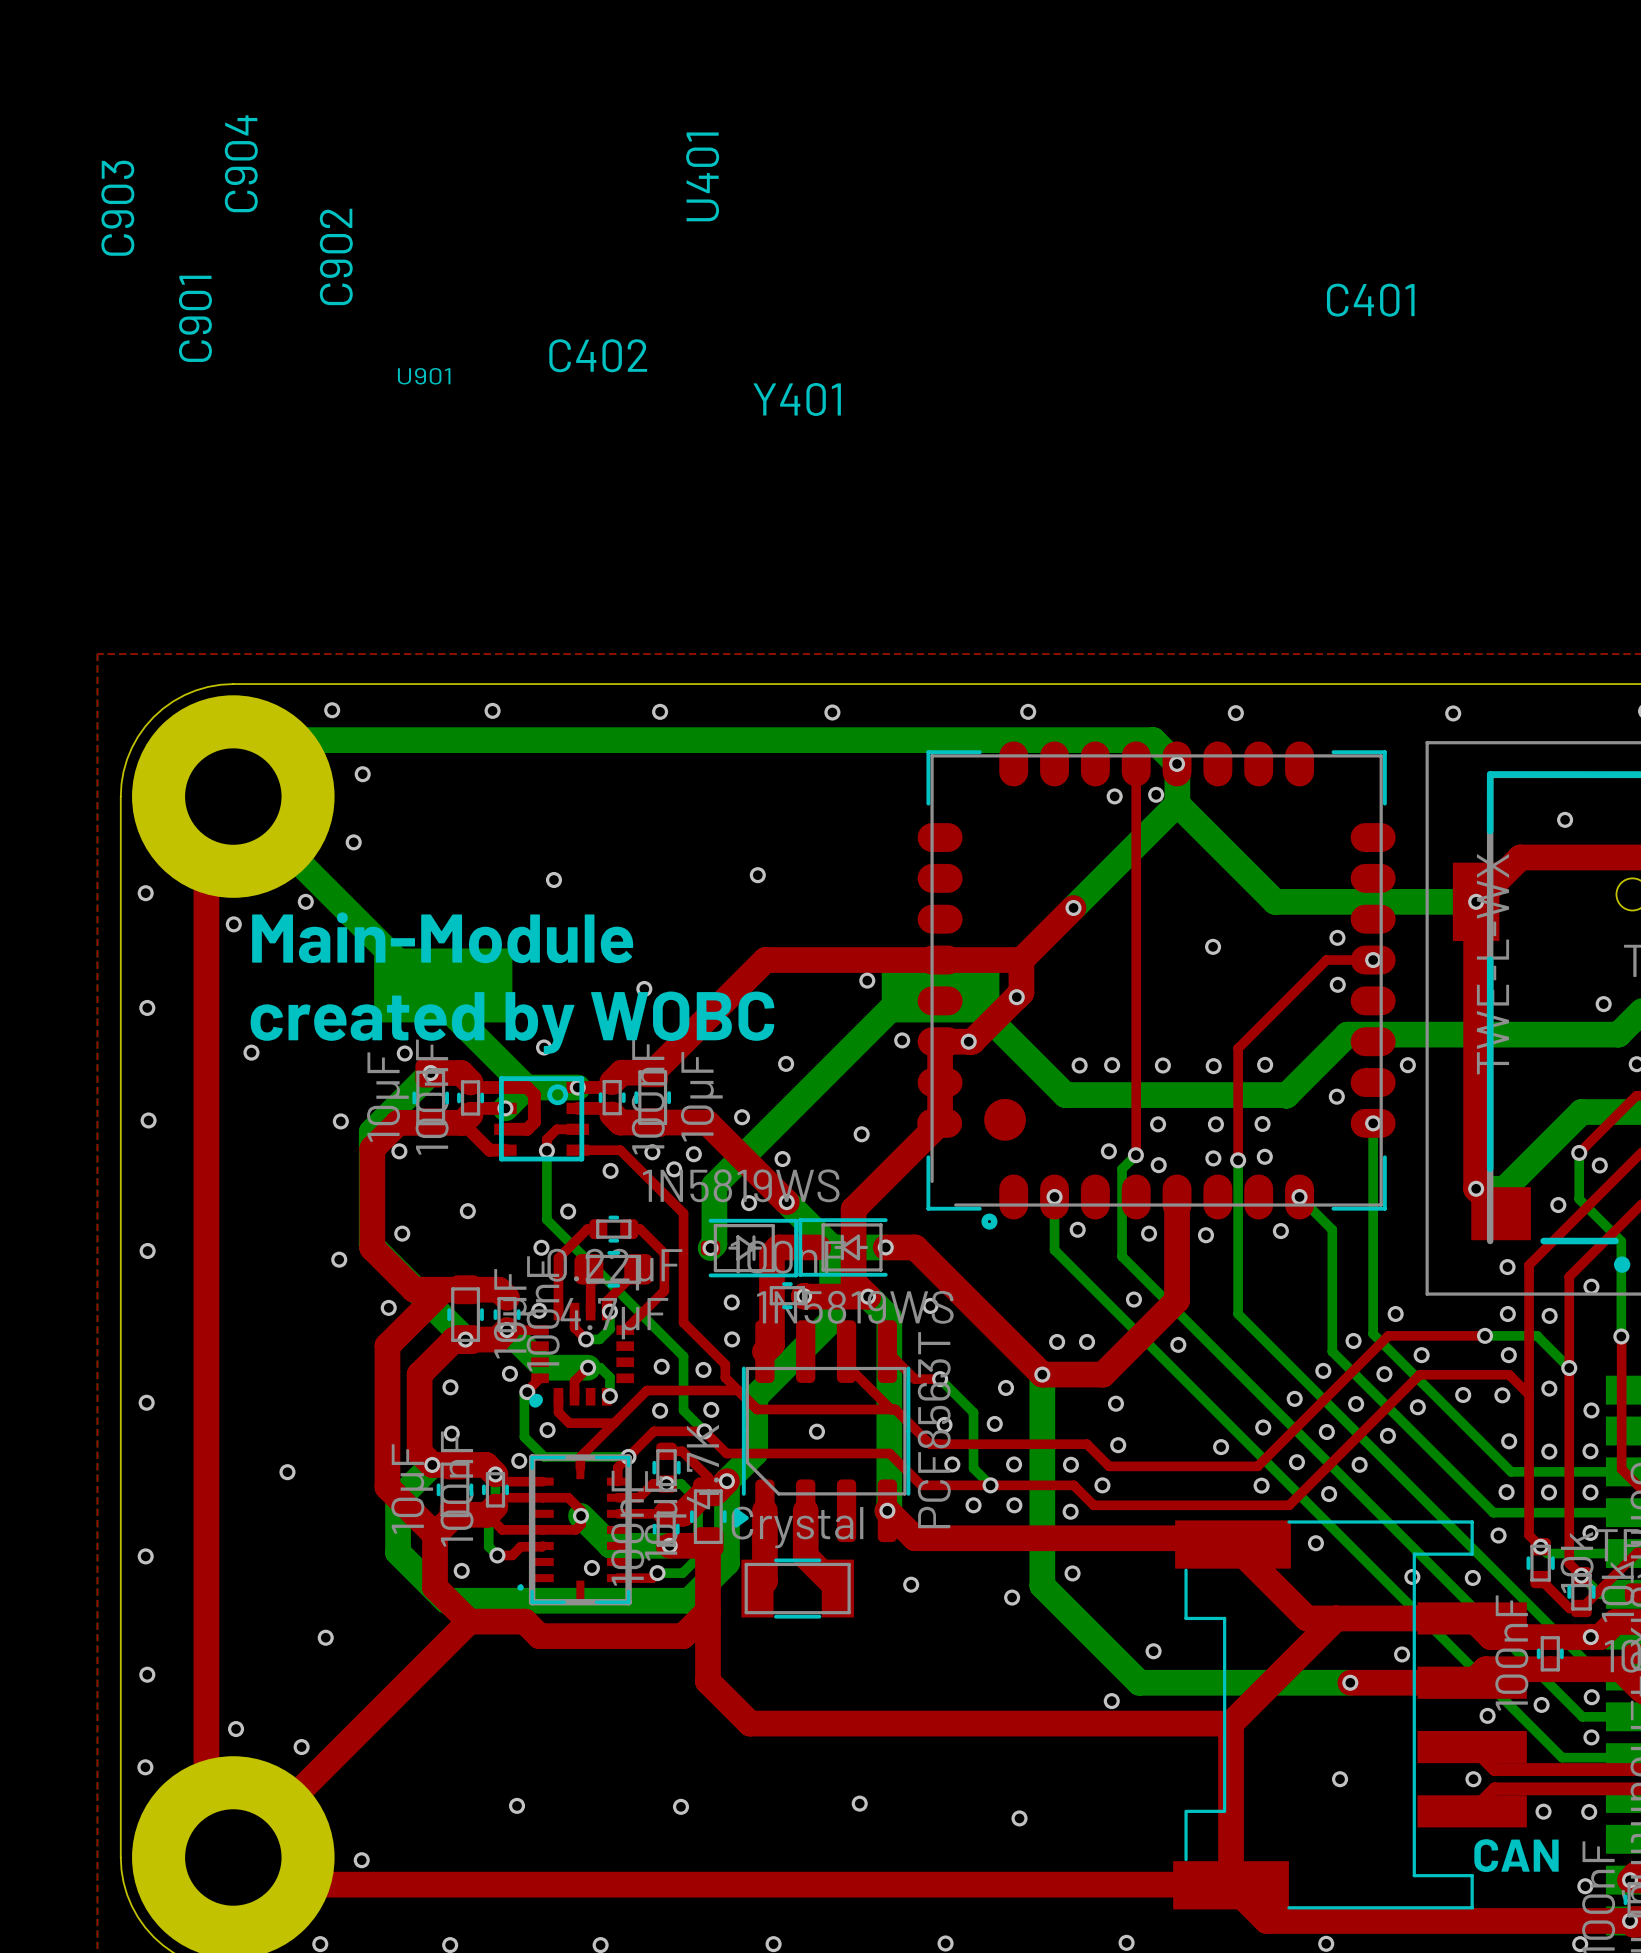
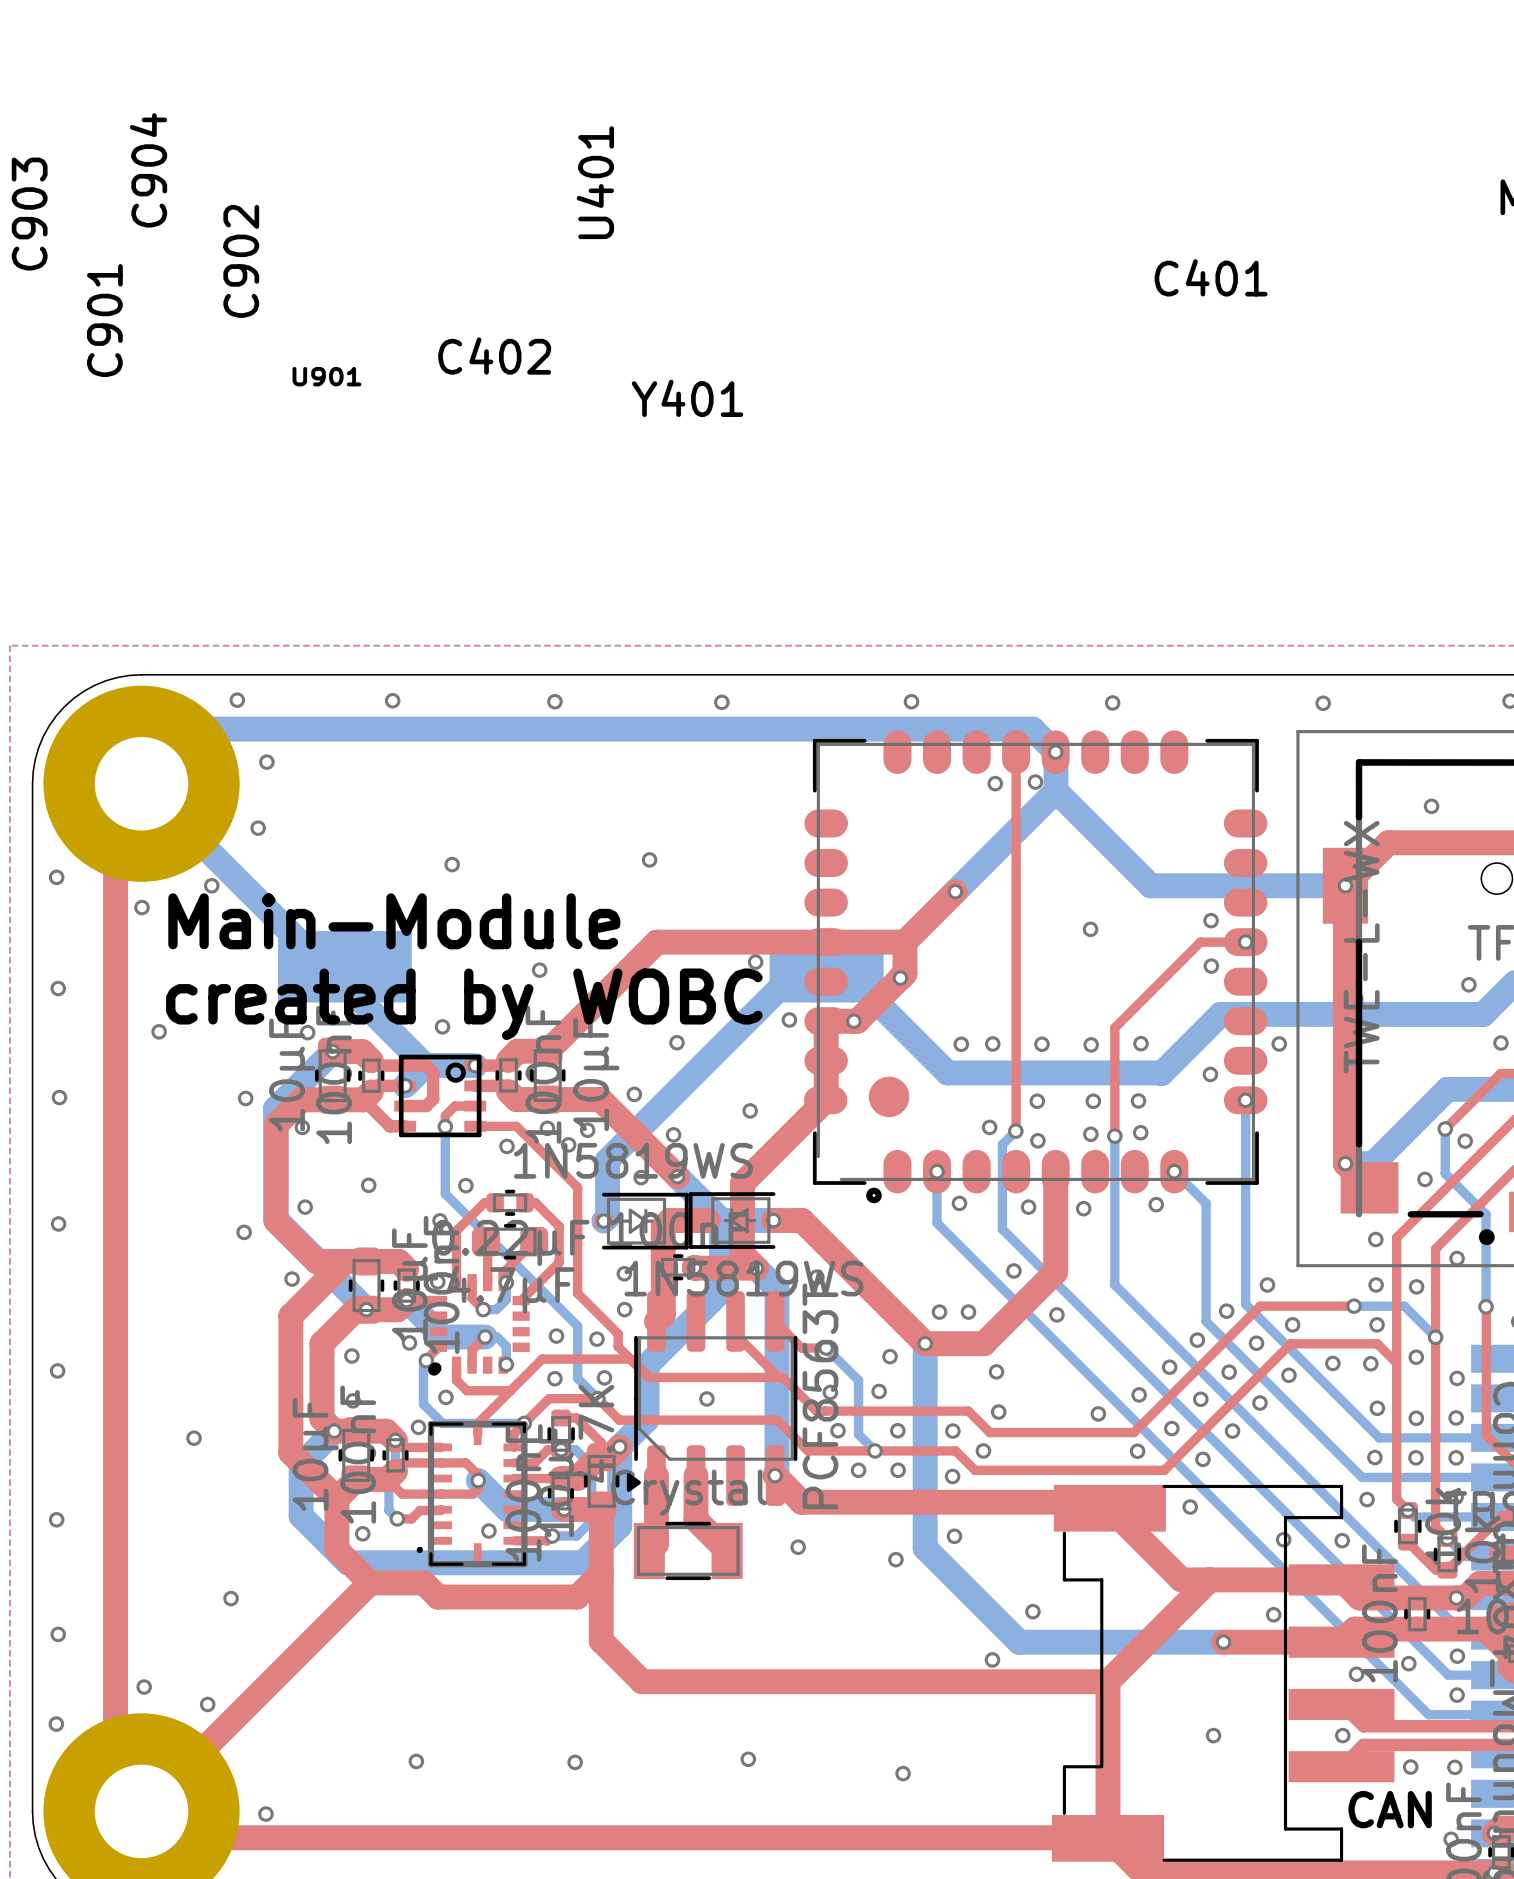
C401 name position: C401 (1370, 300) -> C401 (1211, 277)

